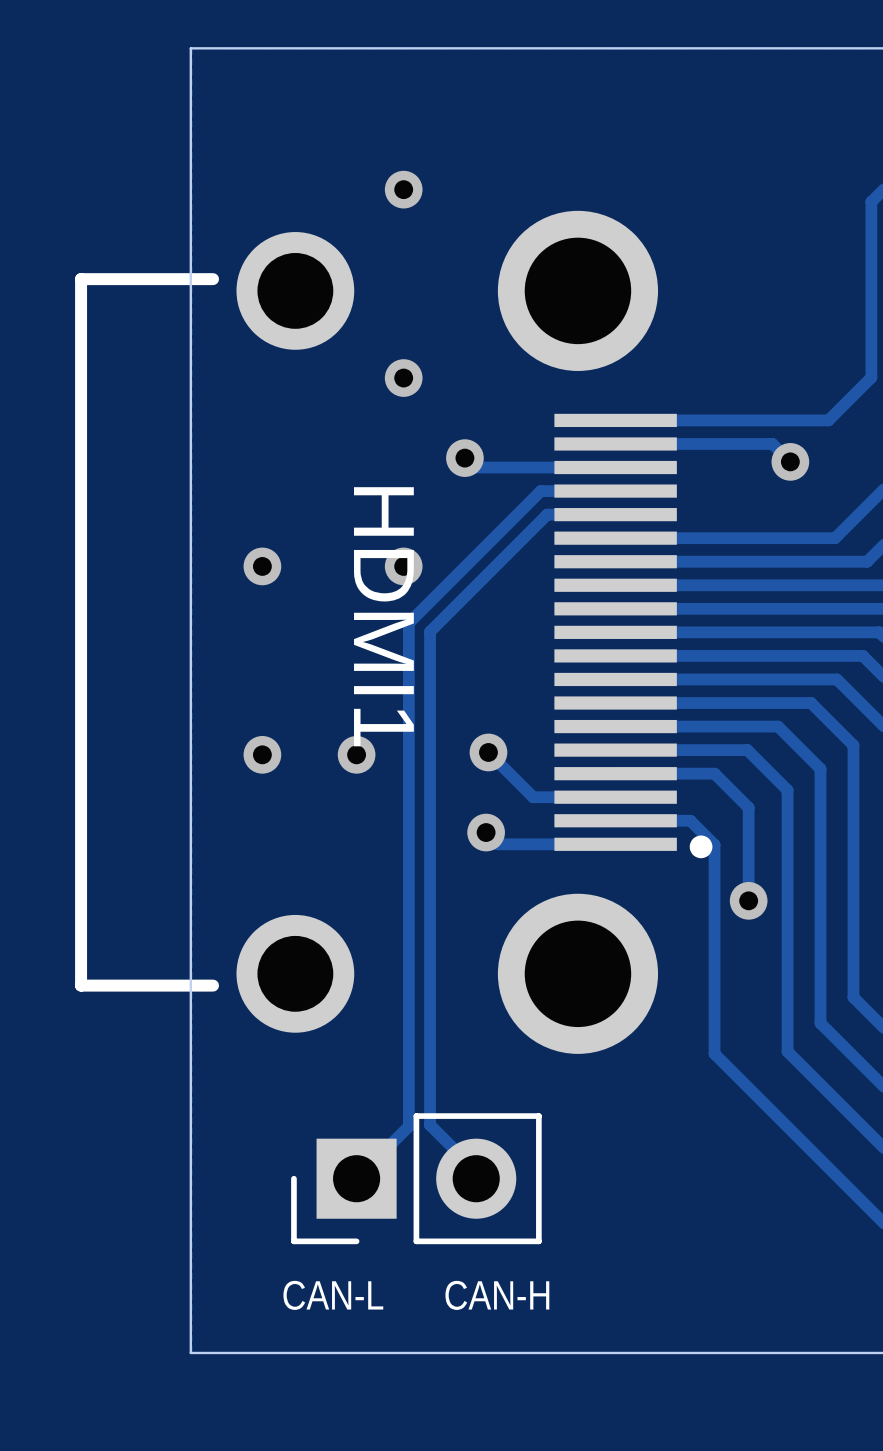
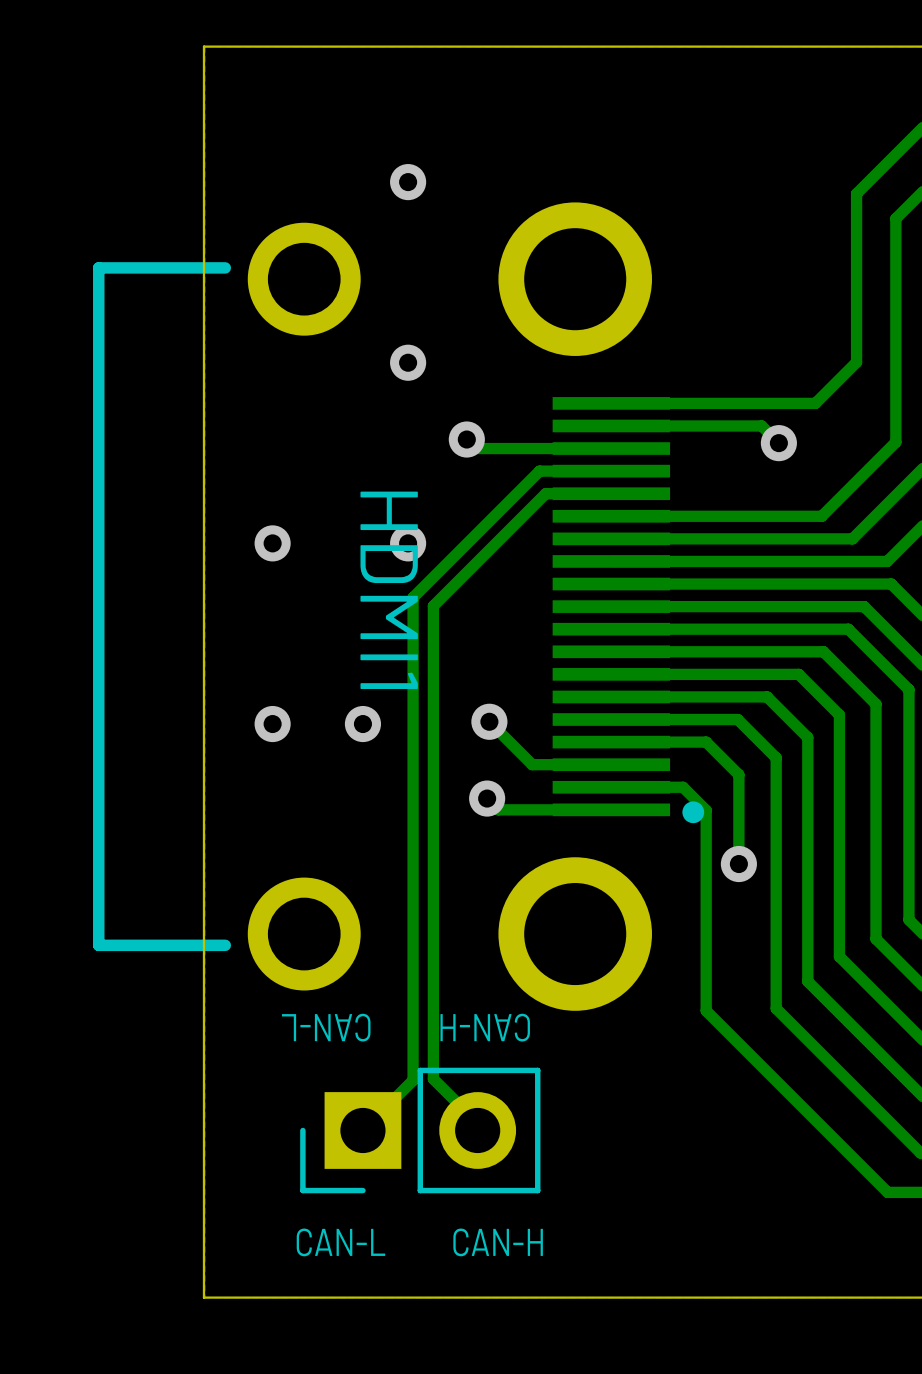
text: none -> CAN-L (326, 1027)
text: none -> CAN-H (485, 1027)

